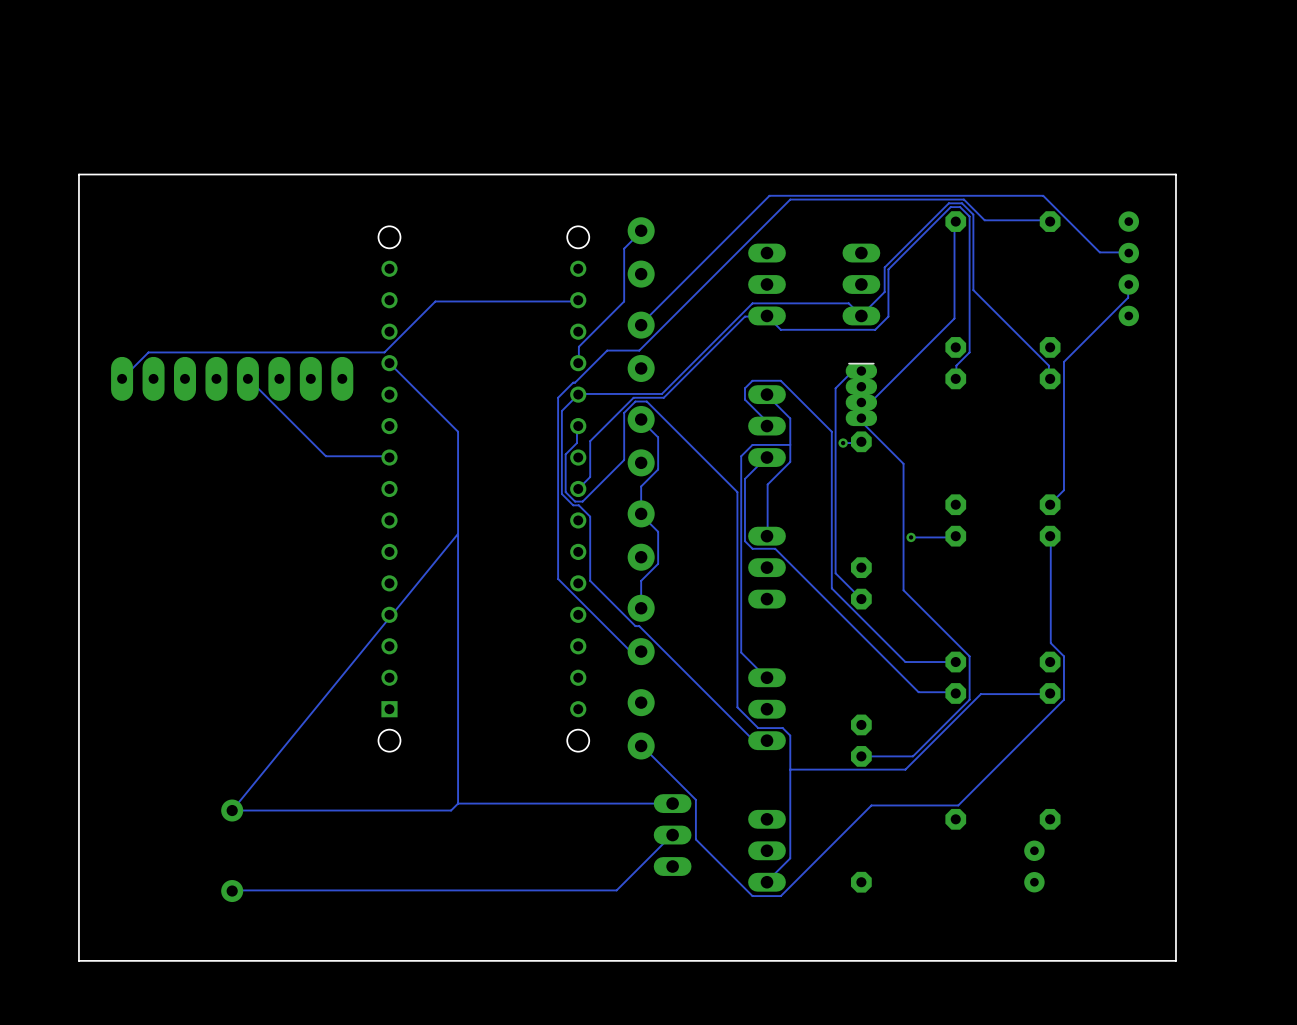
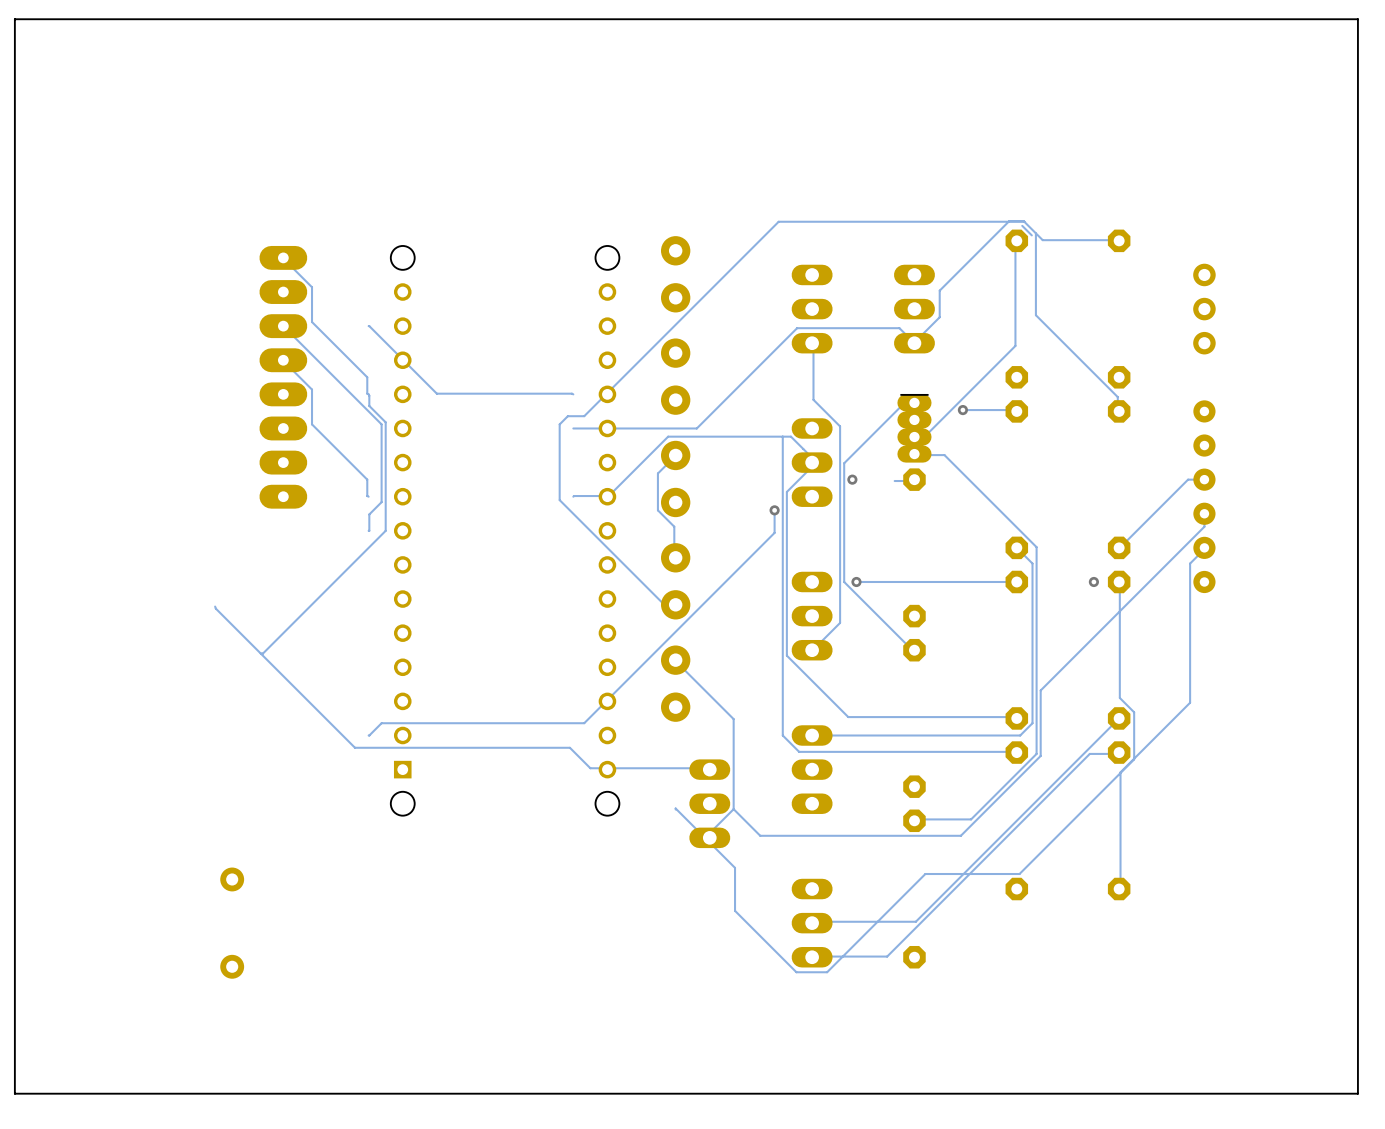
board edge: (1175, 174) (78, 174) (78, 960) (1175, 960) (1175, 174) -> (1357, 19) (1357, 1093) (14, 1093) (14, 19) (1357, 19)
track: (960, 207) (950, 207) (888, 269) (888, 316) (875, 329) (780, 329) (768, 317) -> none
track: (969, 216) (969, 352) (956, 365) (955, 378) -> (962, 410) (1016, 411)
track: (1049, 220) (984, 220) (963, 199) (790, 199) (639, 350) (607, 350) (558, 397) (558, 578) (629, 650) (641, 651) -> (1118, 240) (1042, 240) (1035, 233)
track: (641, 230) (624, 248) (624, 301) (578, 346) (578, 363) -> none
track: none -> (283, 257) (312, 287) (312, 322) (367, 377) (369, 405) (385, 422) (385, 530) (260, 653)
part: (1128, 237) -> none
track: (1128, 253) (1099, 252) (1043, 195) (769, 195) (641, 325) -> none
track: (1128, 284) (1128, 297) (1063, 361) (1063, 490) (1050, 504) -> (1204, 479) (1188, 479) (1119, 547)
part: none -> (1204, 309)
track: none -> (283, 326) (381, 424) (381, 502) (369, 514) (368, 530)
track: none -> (368, 326) (436, 393) (573, 394)
track: (578, 300) (435, 301) (384, 352) (148, 352) (122, 378) -> none
part: (1128, 300) -> none
track: (848, 303) (752, 303) (661, 393) (578, 393) (561, 410) (561, 494) (573, 505) (578, 505) -> (900, 329) (797, 328) (696, 428) (573, 428)
track: (767, 315) (744, 316) (663, 397) (633, 397) (590, 441) (590, 477) (578, 488) -> none
track: none -> (283, 360) (312, 389) (312, 424) (367, 479) (368, 496)
track: (389, 363) (458, 431) (458, 803) -> none
track: (861, 371) (852, 371) (835, 388) (835, 573) (861, 599) -> (914, 402) (903, 403) (844, 463) (844, 581) (913, 651) (914, 650)
via: none -> (962, 410)
part rotation: 0° (232, 378) -> 90° clockwise (283, 377)
track: (247, 378) (325, 456) (389, 457) -> none
track: (780, 380) (752, 380) (744, 388) (744, 399) (747, 402) -> (827, 413) (813, 399) (813, 344)
track: (792, 392) (831, 431) (831, 588) (905, 662) (955, 662) -> (812, 462) (811, 467) (786, 491) (786, 655) (848, 717) (1016, 718)
track: none -> (840, 426) (840, 622) (812, 650)
track: (767, 394) (790, 418) (790, 461) (767, 484) (767, 536) -> none
part: none -> (1204, 428)
track: none -> (790, 436) (668, 436) (608, 496) (573, 496)
track: (861, 418) (862, 422) (903, 463) (903, 590) (969, 656) (969, 699) (912, 756) (861, 756) -> (914, 454) (944, 455) (1036, 547) (1036, 753) (971, 819) (914, 820)
track: (641, 419) (658, 437) (658, 469) (641, 486) (641, 514) (658, 531) (658, 563) (641, 580) (641, 608) -> (675, 455) (657, 473) (657, 510) (674, 526) (675, 557)
track: (578, 426) (576, 443) (565, 454) (565, 492) -> (1024, 221) (778, 221) (584, 416) (567, 416) (559, 424) (559, 500) (593, 534)
via position: (843, 443) -> (852, 479)
track: (790, 444) (752, 444) (741, 456) (741, 652) (767, 677) -> (1016, 547) (1032, 563) (1032, 723) (1020, 735) (812, 735)
track: (767, 457) (744, 478) (744, 541) (752, 548) (775, 548) (918, 692) (955, 692) -> (782, 436) (782, 735) (799, 751) (1016, 751)
part: none -> (1204, 496)
track: none -> (774, 510) (774, 532) (584, 723) (381, 723) (368, 735)
via: none -> (774, 510)
track: none -> (1204, 513) (1204, 526) (1040, 690) (1040, 755) (960, 835) (760, 835) (733, 809)
track: (575, 501) (582, 501) (624, 460) (624, 412) (635, 401) (646, 401) (737, 492) (737, 707) (758, 728) (782, 728) (790, 735) (790, 858) (767, 882) -> (604, 544) (608, 548)
track: none -> (1204, 547) (1190, 563) (1190, 702) (1120, 772) (1119, 889)
track: (590, 516) (590, 580) (635, 626) (639, 626) (752, 739) (767, 740) -> (620, 560) (664, 604) (675, 604)
part: none -> (1204, 564)
track: (458, 533) (232, 810) (451, 810) (458, 803) -> none
via: none -> (856, 581)
track: (955, 536) (911, 537) -> (1016, 581) (856, 581)
via: none -> (1093, 581)
via: (911, 537) -> none
track: none -> (215, 606) (355, 747) (569, 747) (590, 768) (709, 769)
track: none -> (675, 660) (733, 719) (733, 809)
track: none -> (1119, 718) (915, 921) (812, 923)
track: (1050, 693) (980, 694) (905, 769) (790, 769) -> (1119, 752) (1089, 753) (887, 956) (812, 957)
part: (641, 724) -> none
track: none -> (733, 809) (711, 831) (709, 837)
track: (672, 803) (458, 803) -> none
track: (672, 835) (616, 890) (232, 891) -> none
part position: (672, 835) -> (709, 803)
part: (1034, 866) -> none

